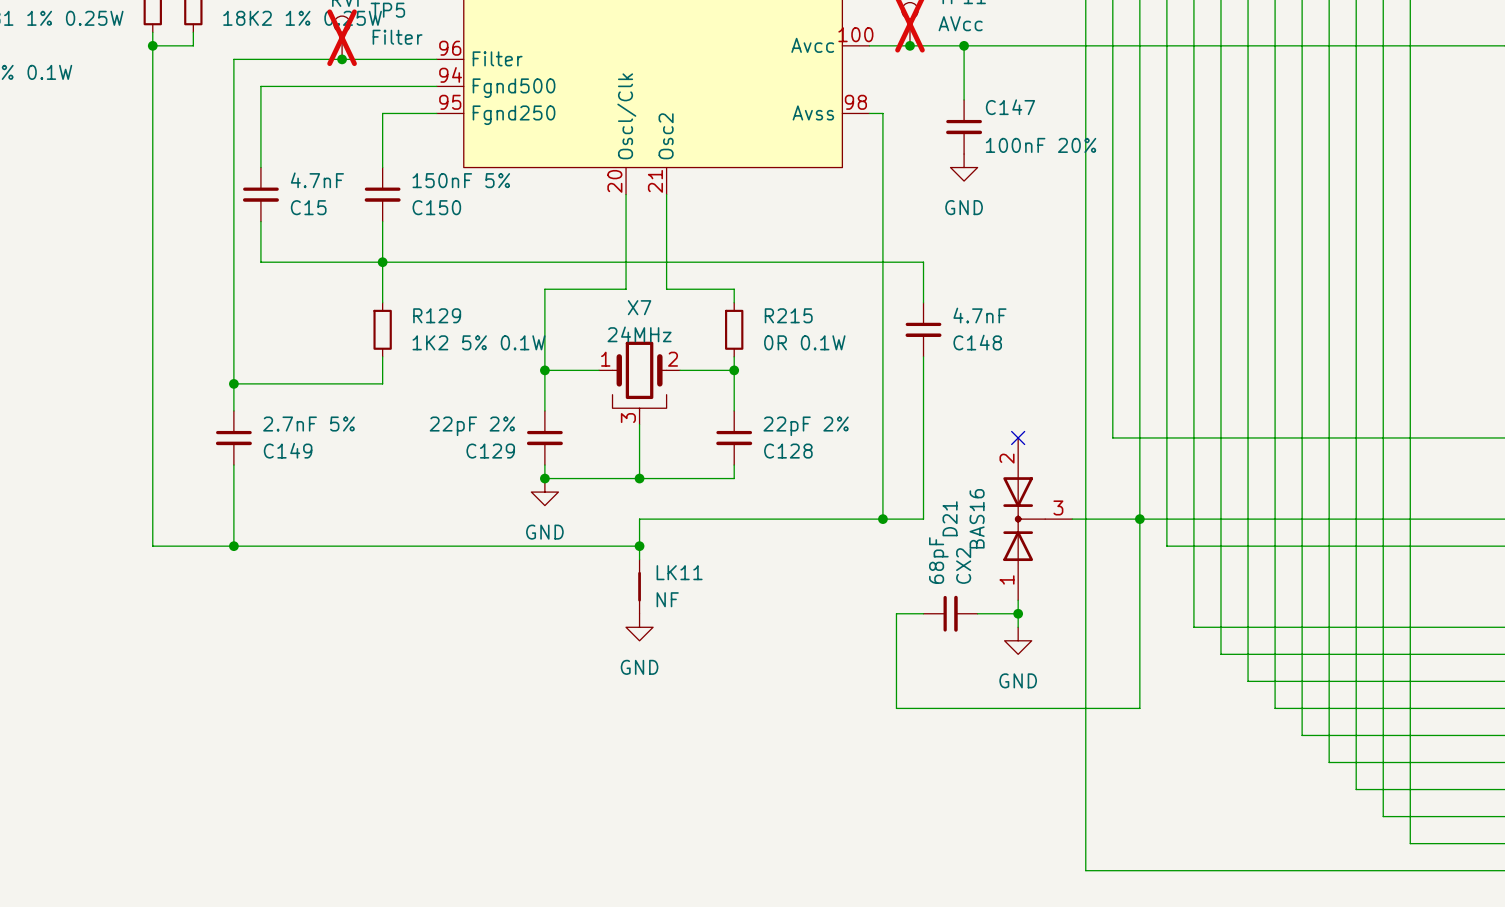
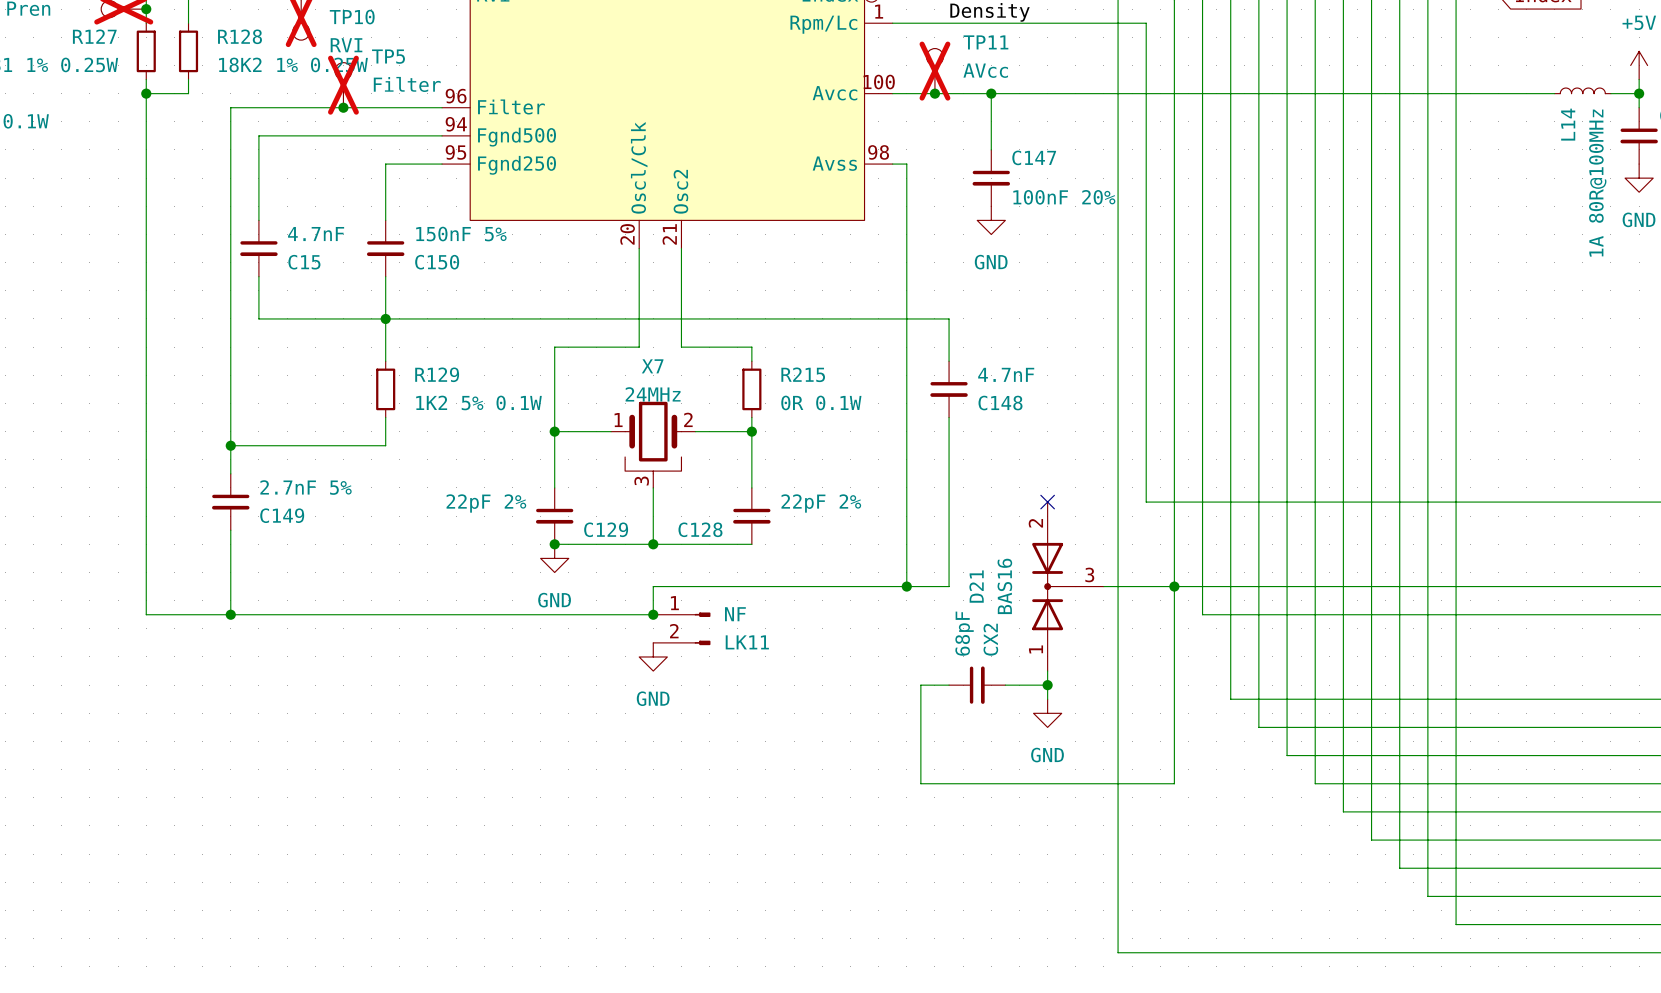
C129 position: (544, 437) -> (554, 516)
C128 position: (734, 437) -> (751, 516)
C129 name position: C129 (490, 451) -> C129 (606, 529)
C128 name position: C128 (788, 451) -> C128 (700, 529)
wire: (639, 546) (639, 559) -> none
LK11 symbol: [638, 559, 641, 614] -> [653, 612, 711, 646]
LK11 name position: LK11 (679, 572) -> LK11 (747, 642)
LK11 value position: NF (667, 599) -> NF (735, 614)
power symbol position: GND (639, 627) -> GND (653, 656)

